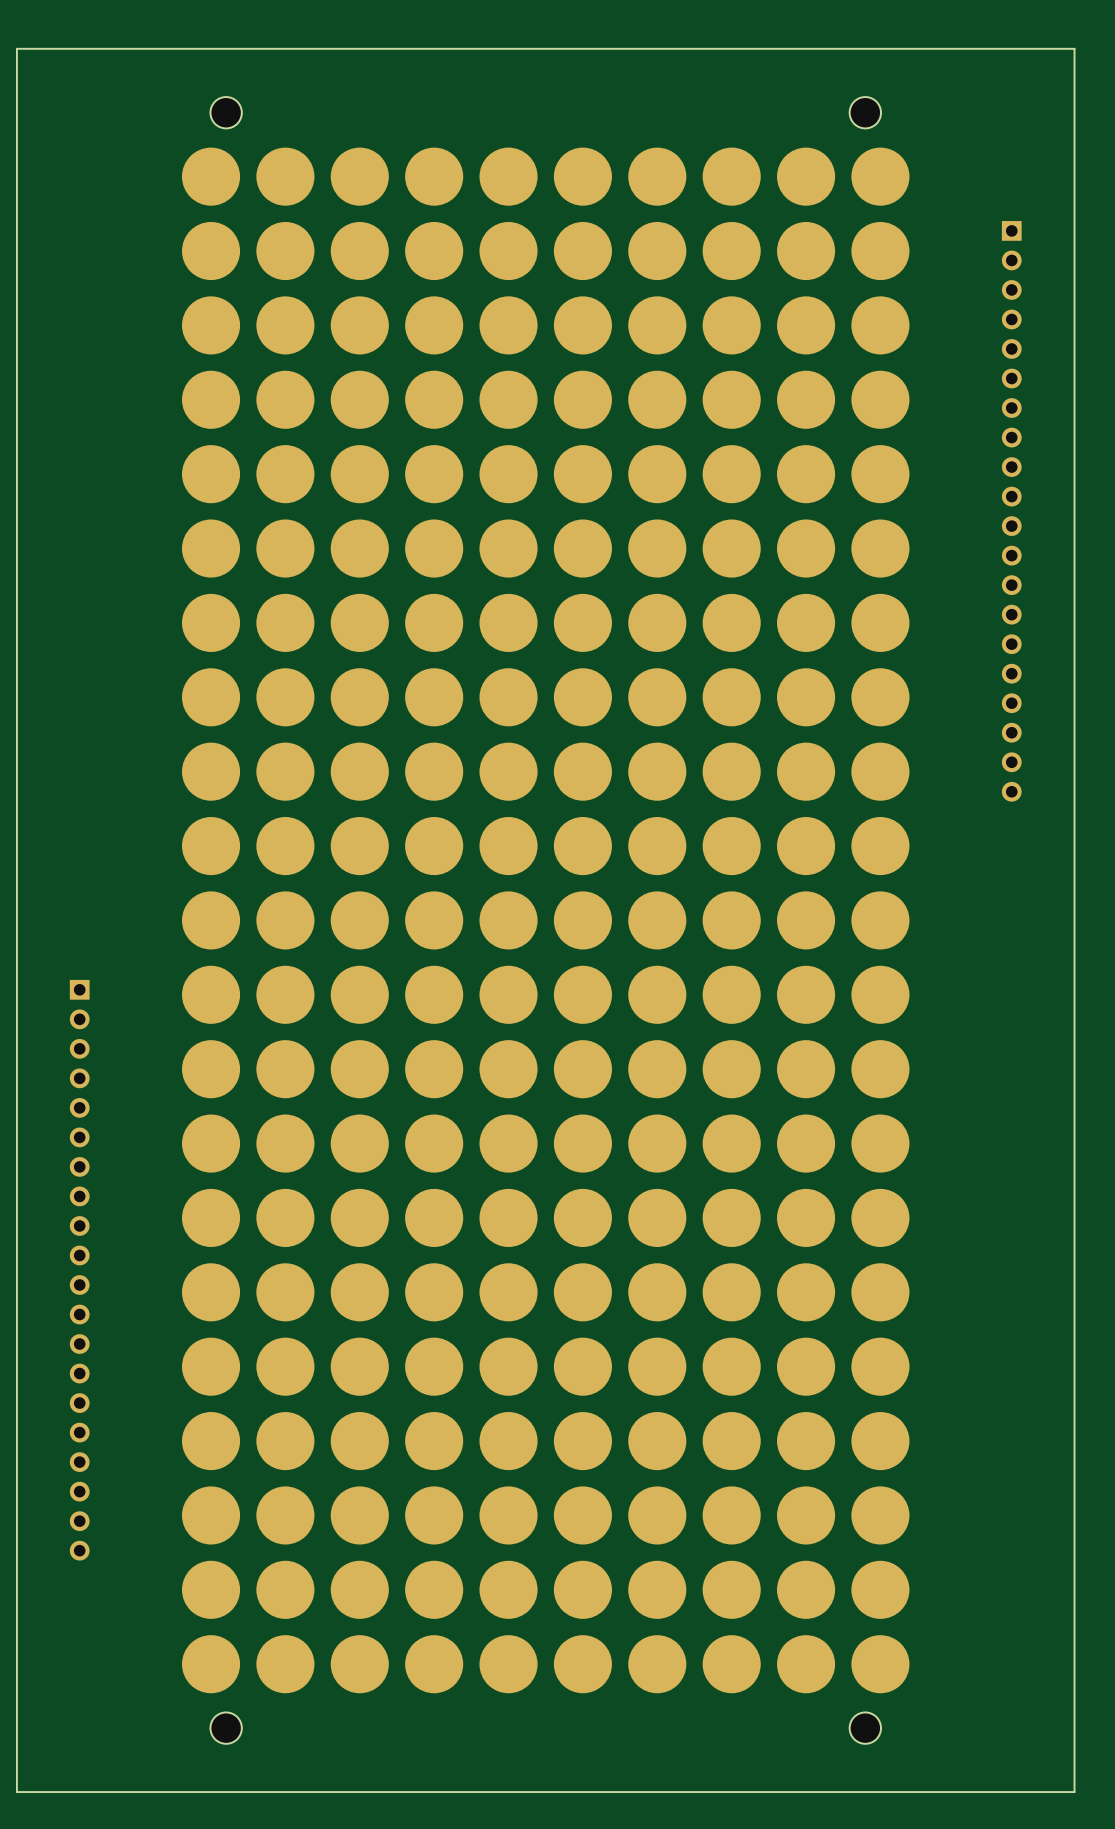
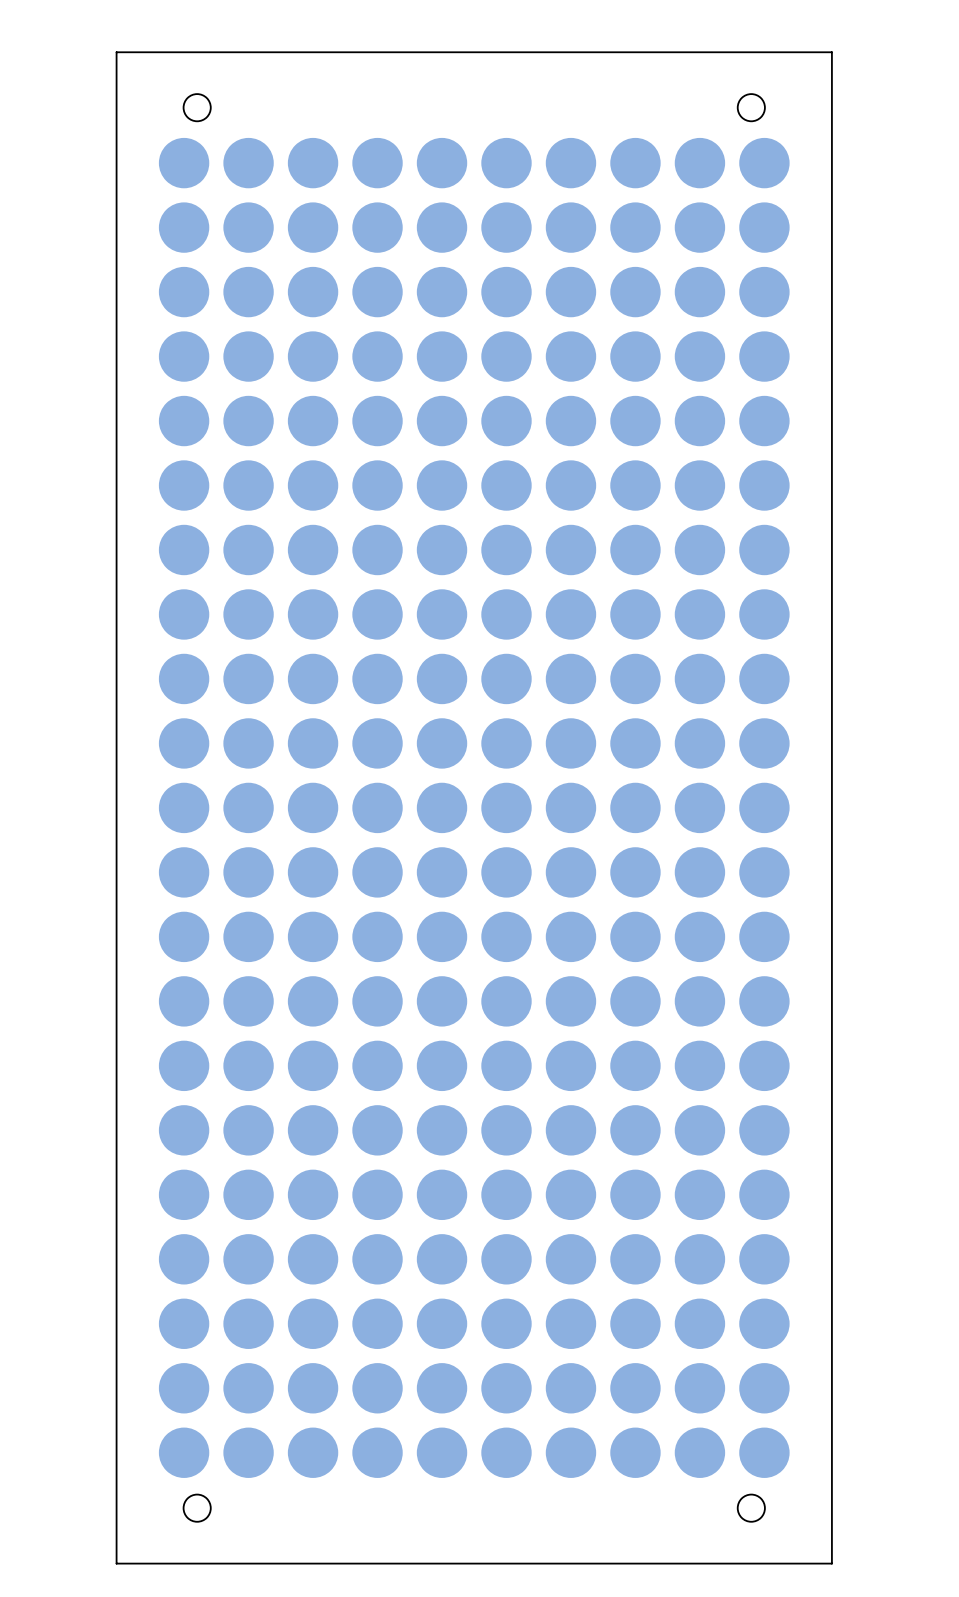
board edge: (133, 48) (16, 48) (16, 1792) (133, 1792) -> (116, 52) (116, 1563)
board edge: (958, 48) (1074, 48) (1074, 1792) (958, 1792) -> (831, 52) (831, 1563)
part: (1011, 511) -> none
part: (79, 1270) -> none

